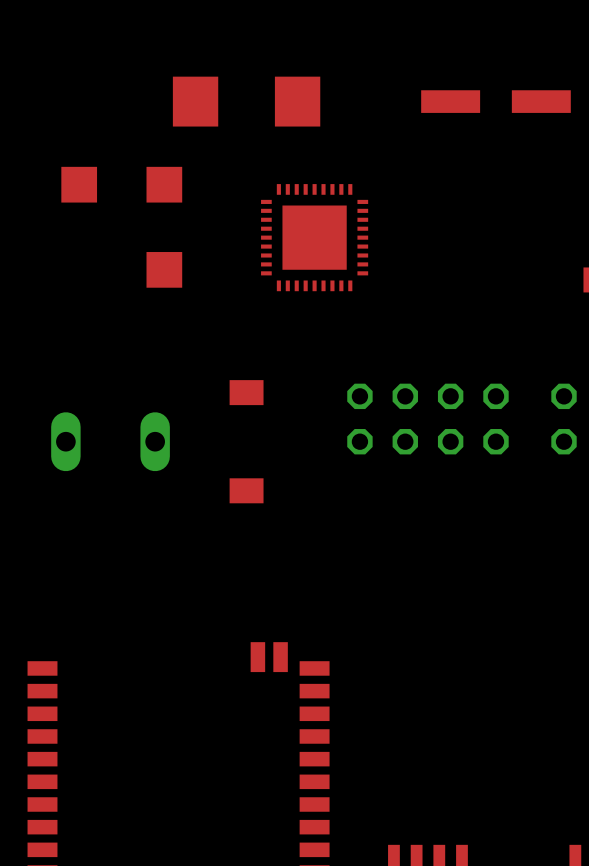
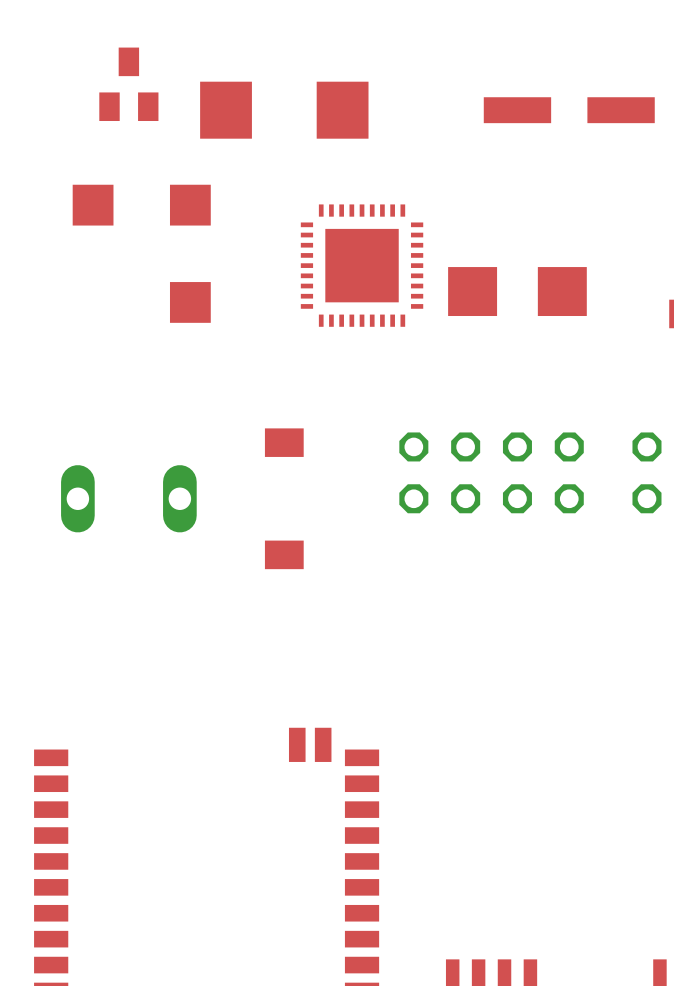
part: none -> (128, 84)
part: none -> (517, 291)

